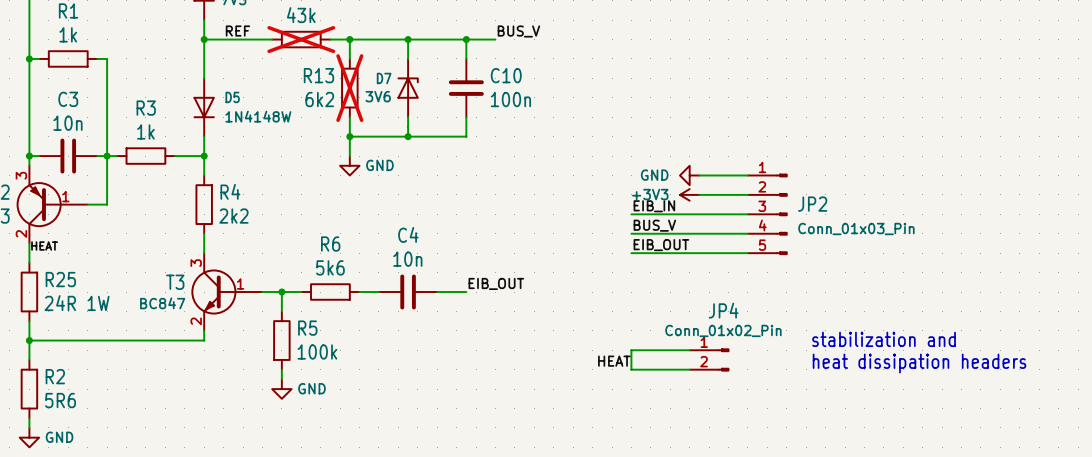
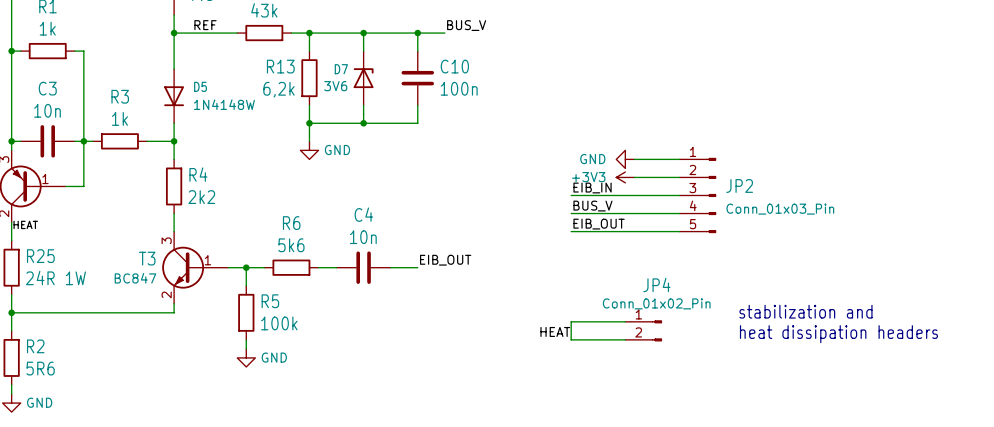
part do-not-place cross: (301, 39) -> none
R13 do-not-place cross: (349, 88) -> none
R13 value: 6k2 (319, 99) -> 6,2k (278, 89)

